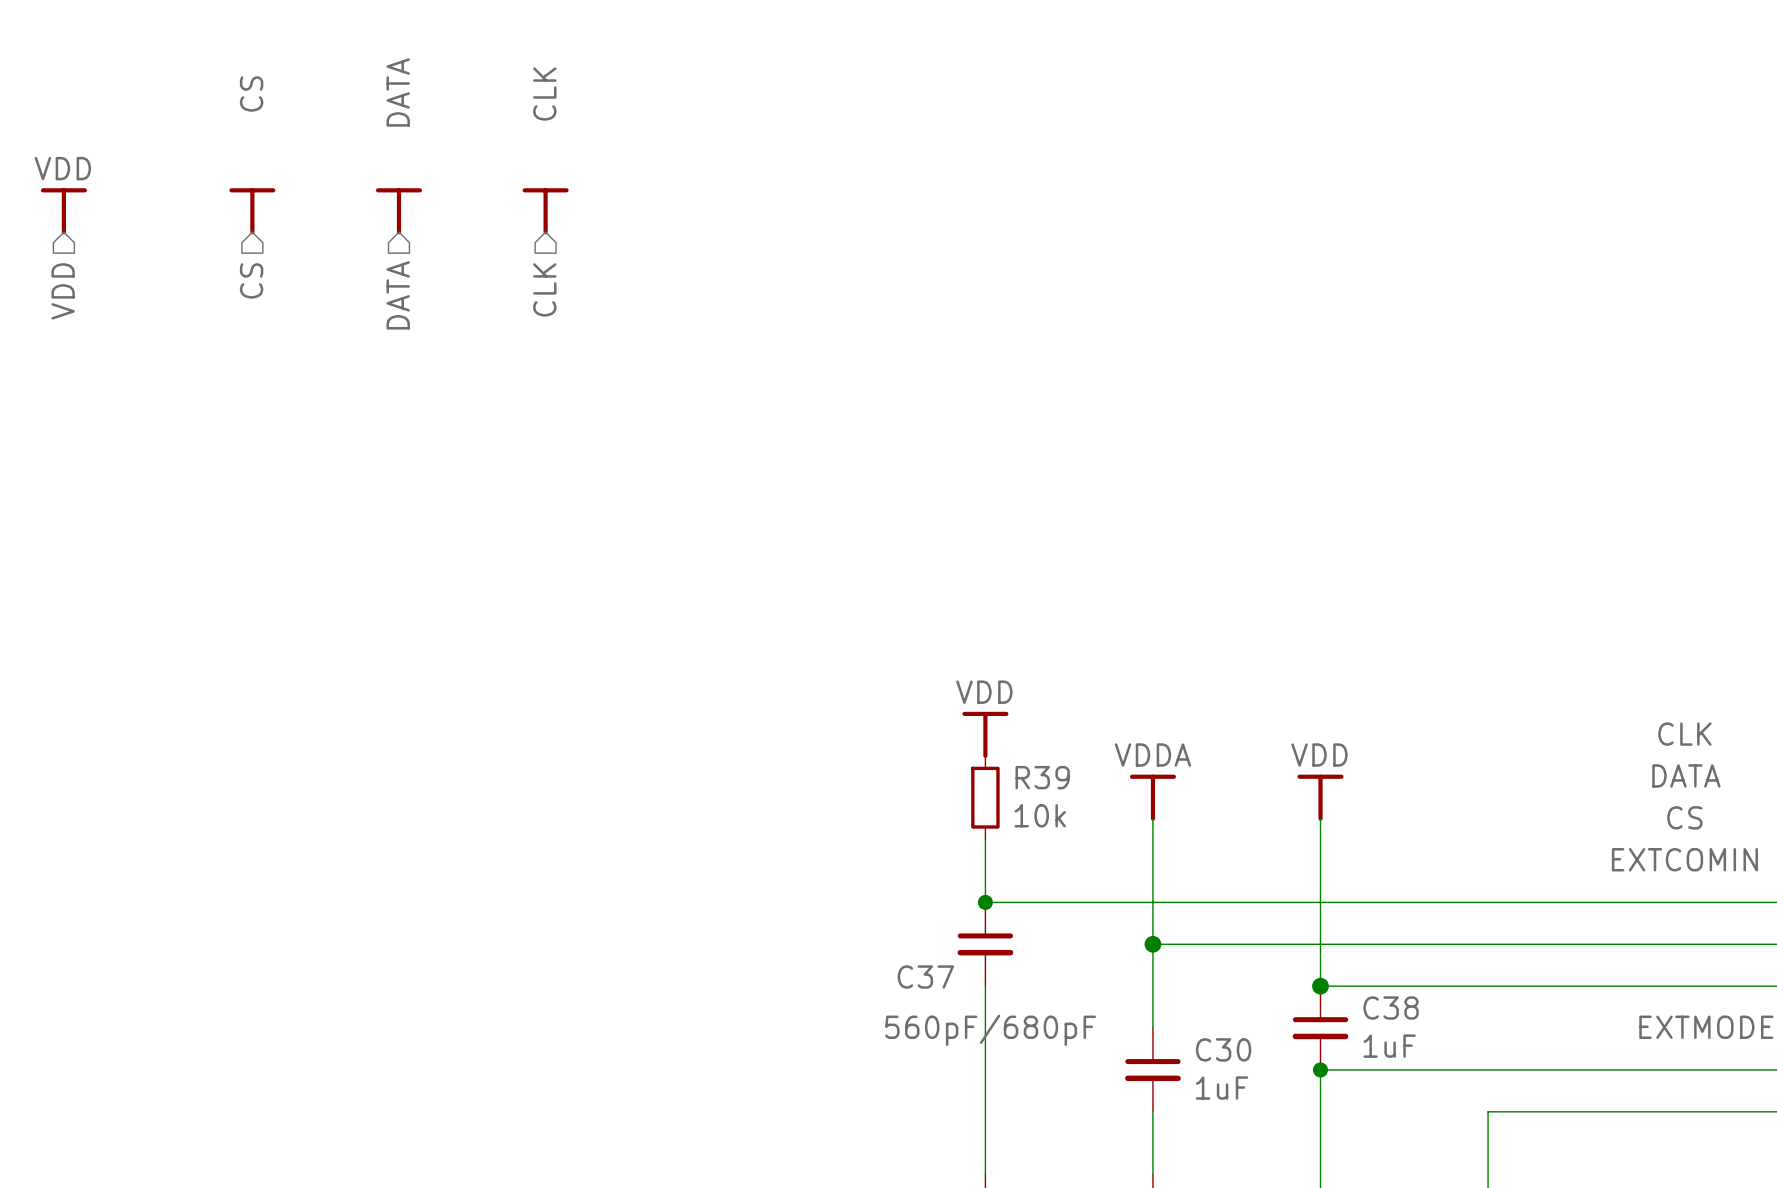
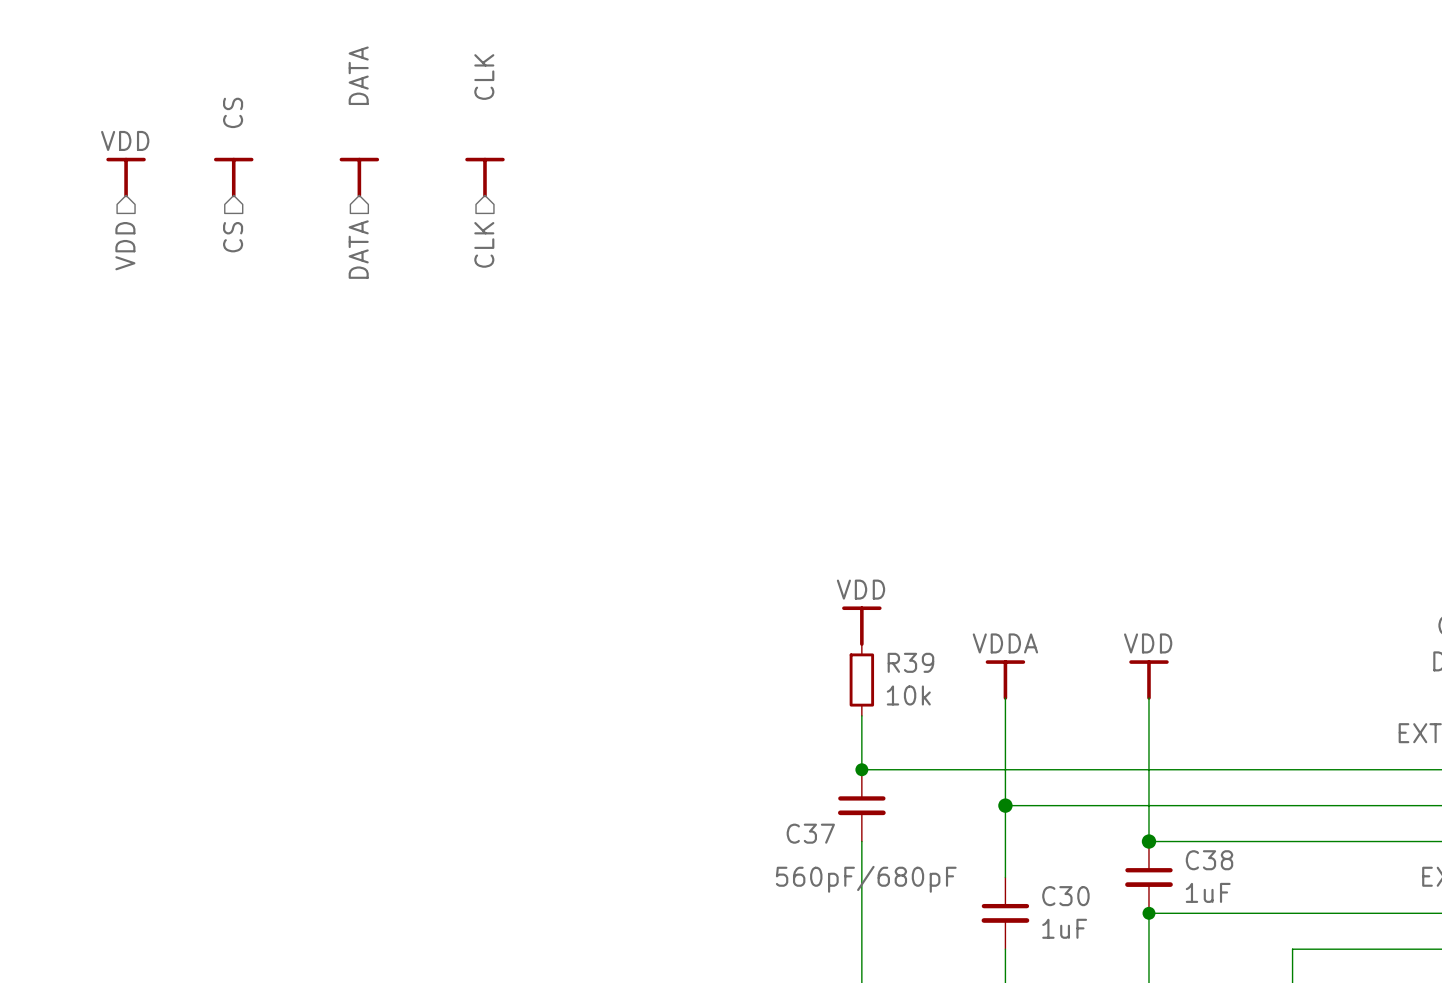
power symbol text position: CS (251, 93) -> CS (233, 112)
power symbol position: VDD (63, 211) -> VDD (126, 177)
hierarchical label position: VDD (63, 291) -> VDD (125, 246)

